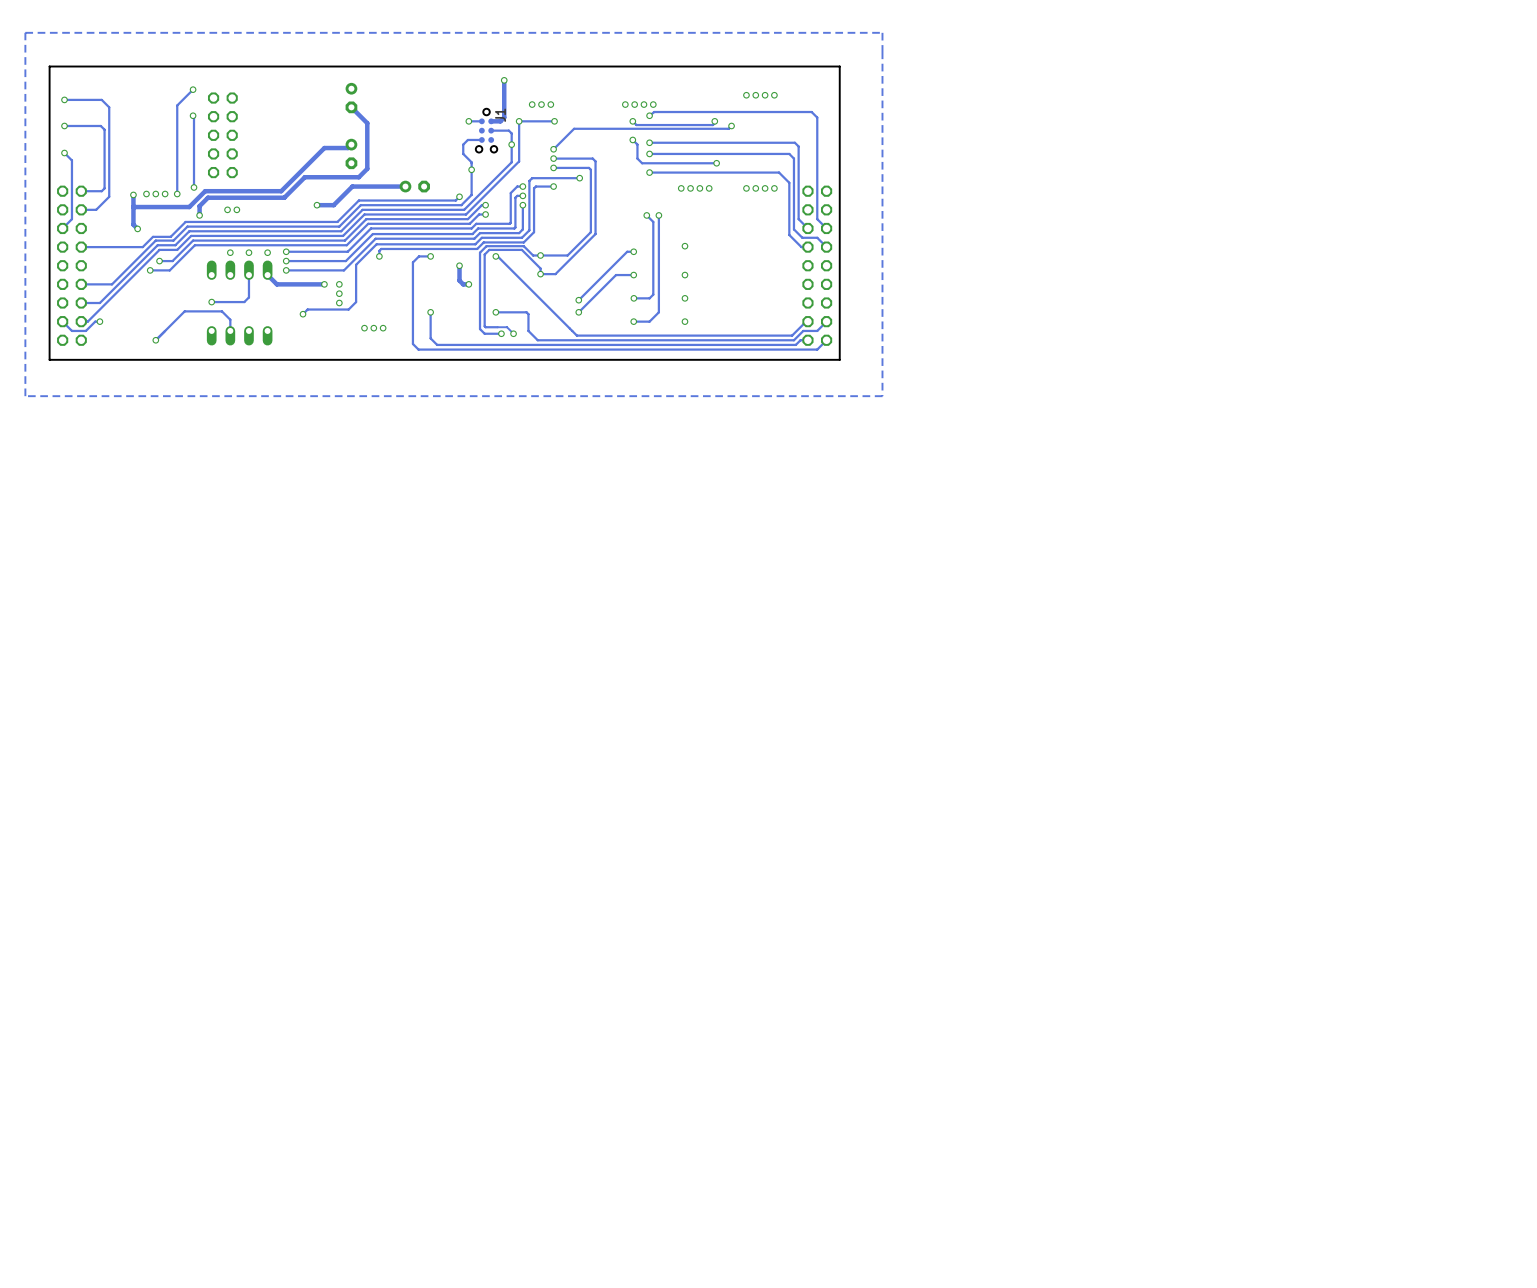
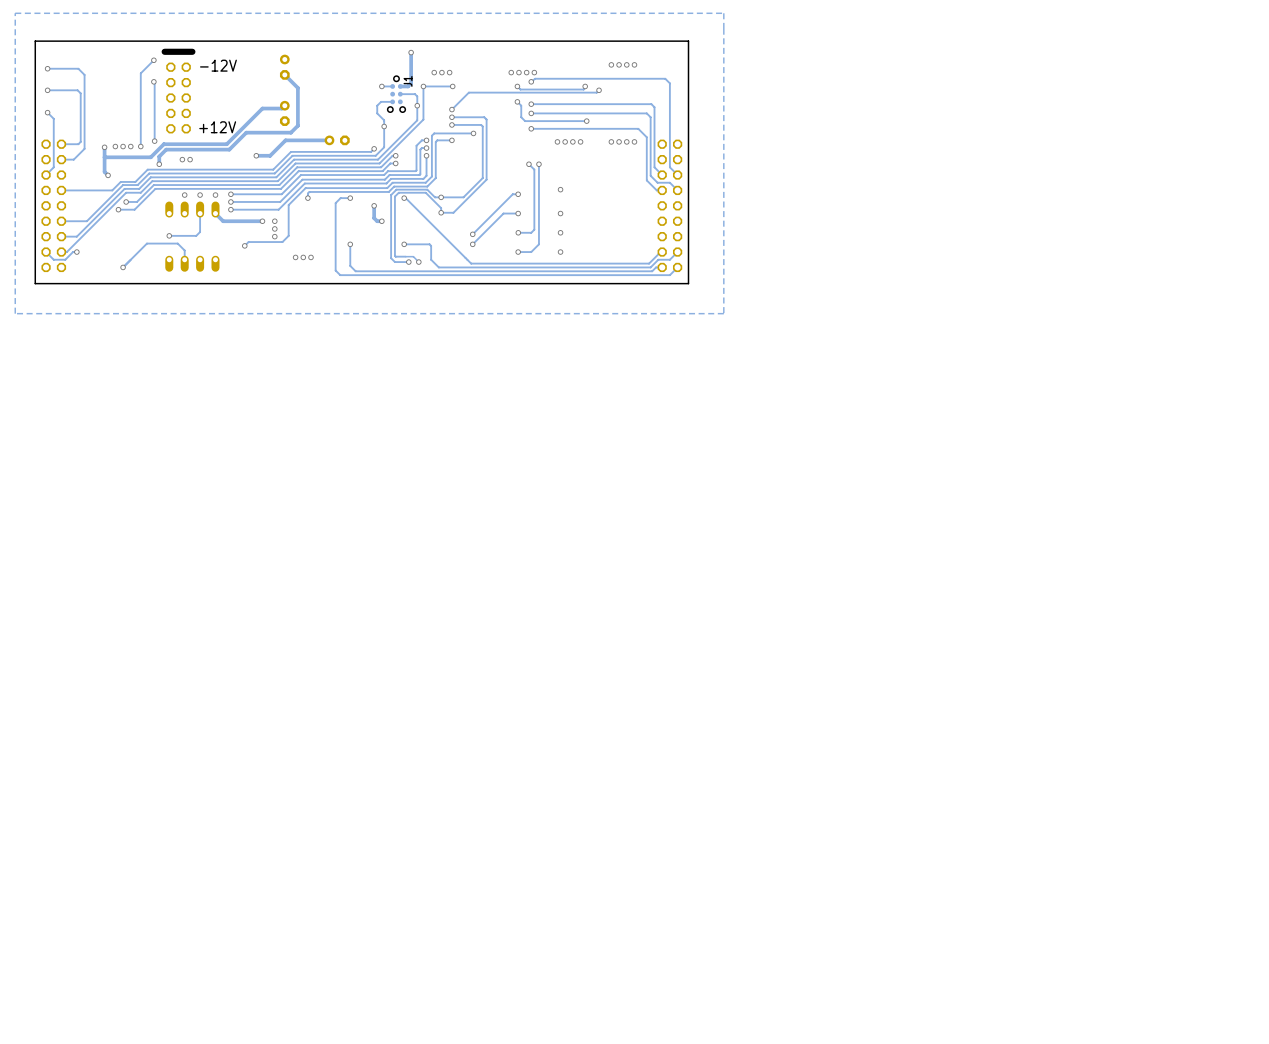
line: none -> (192, 51) (164, 51)
text: none -> -12V (218, 65)
text: none -> +12V (217, 127)

